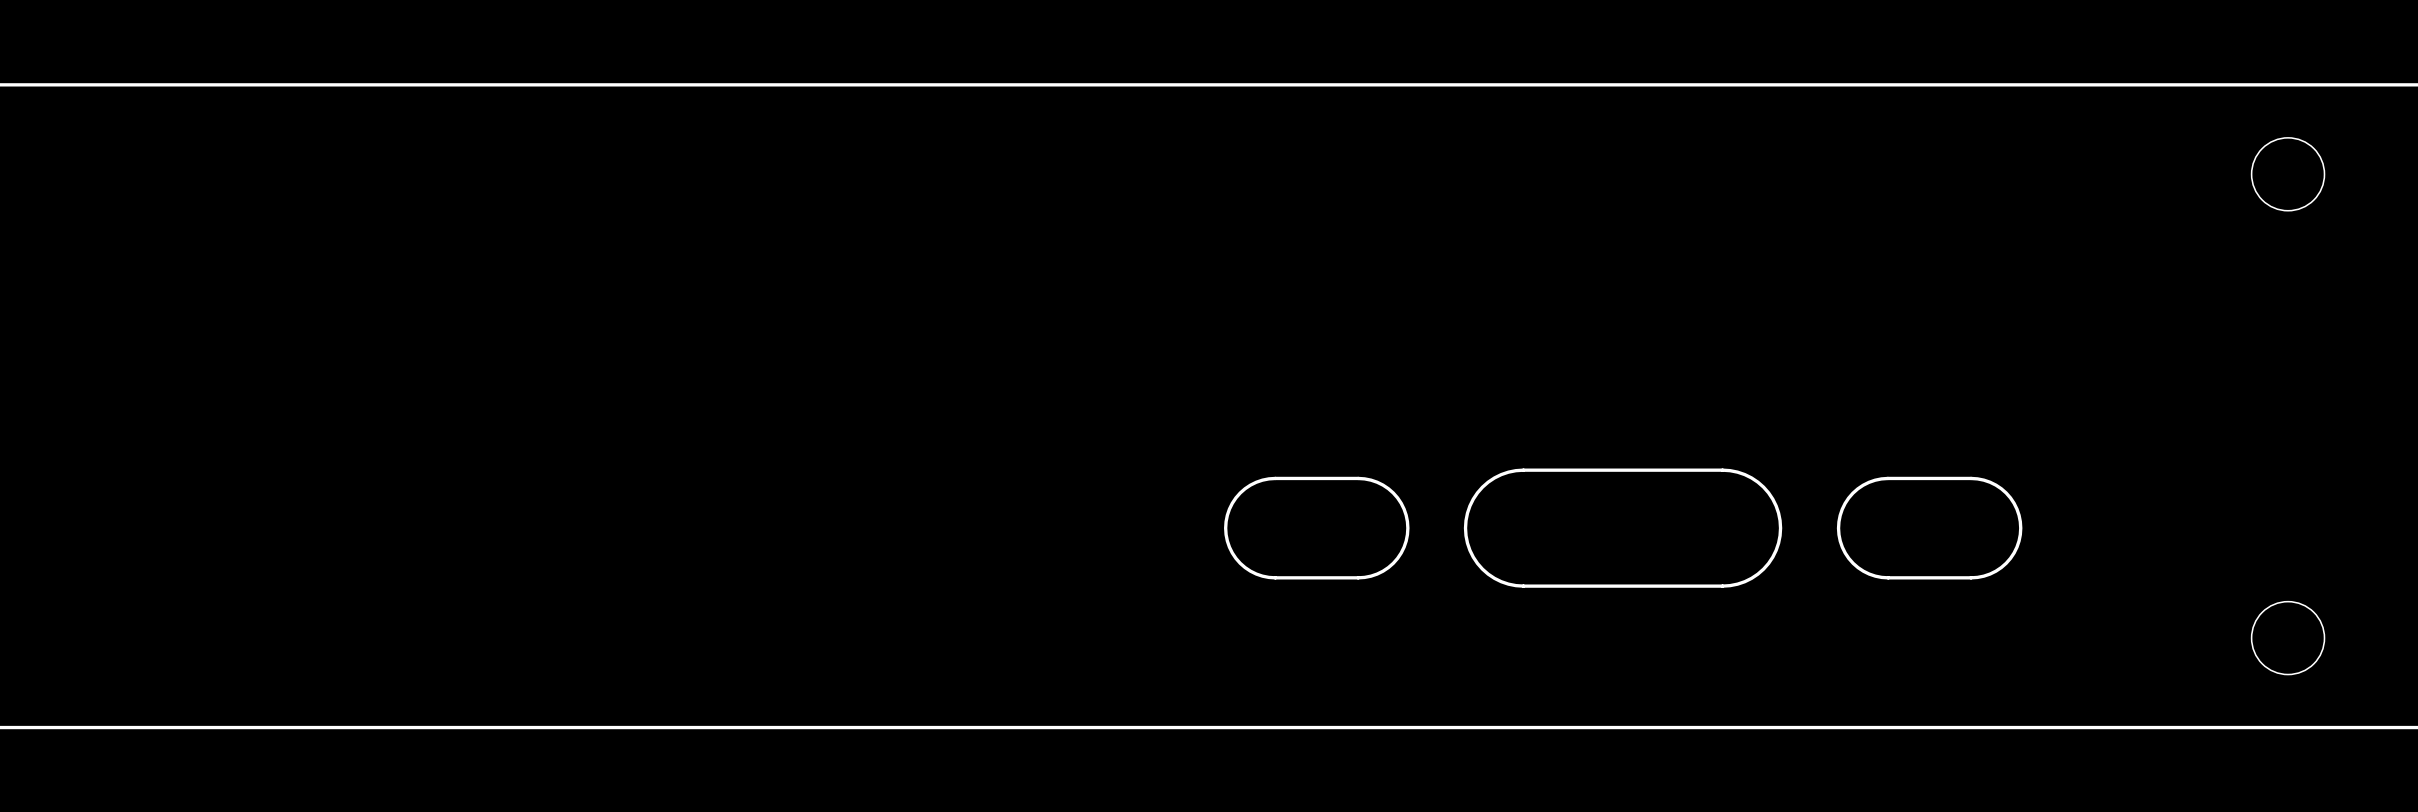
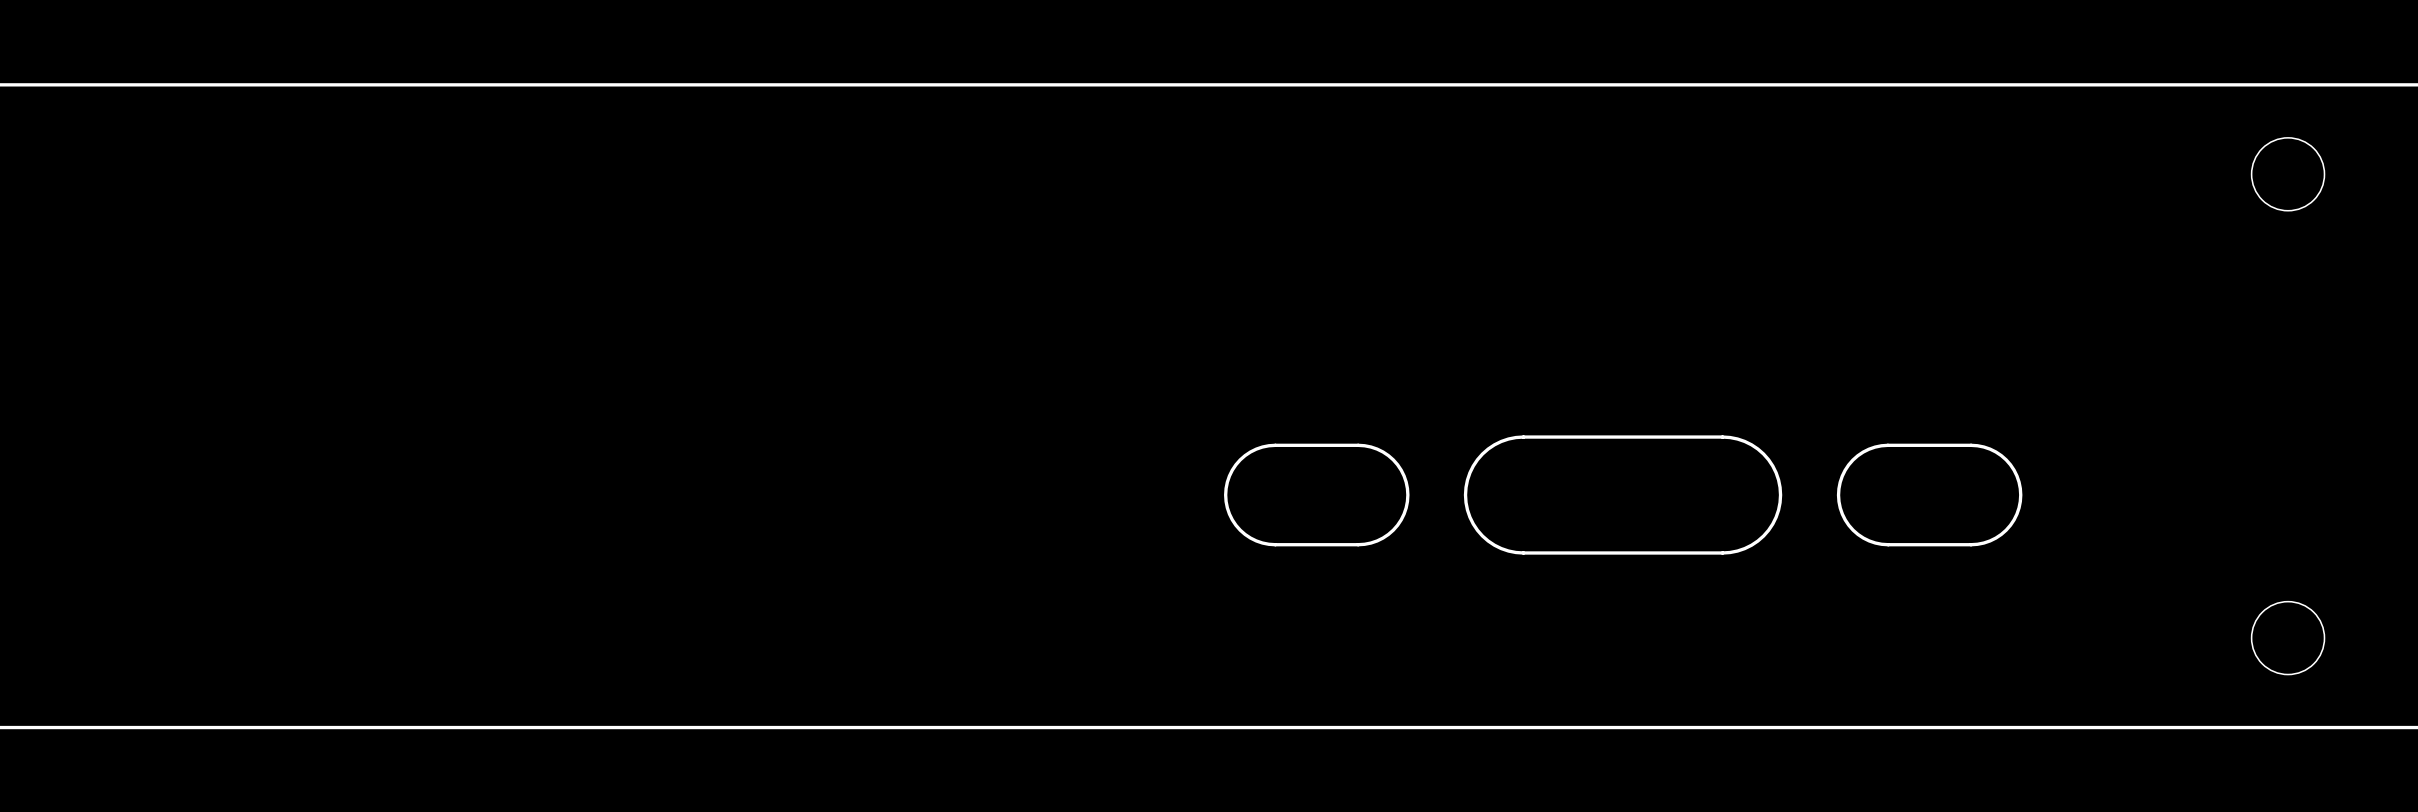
board edge: (1523, 470) (1722, 470) (1737, 472) (1757, 482) (1772, 499) (1780, 520) (1778, 543) (1772, 557) (1763, 569) (1751, 578) (1730, 585) (1523, 586) (1508, 584) (1494, 578) (1477, 563) (1467, 543) (1466, 520) (1469, 505) (1482, 487) (1501, 474) (1523, 470) -> (1523, 437) (1722, 437) (1737, 439) (1757, 449) (1772, 466) (1780, 487) (1778, 510) (1772, 524) (1763, 536) (1751, 545) (1730, 552) (1523, 552) (1508, 551) (1494, 545) (1477, 530) (1467, 510) (1466, 487) (1469, 472) (1482, 454) (1501, 441) (1523, 437)
board edge: (1275, 478) (1358, 478) (1371, 480) (1383, 485) (1397, 497) (1406, 515) (1407, 534) (1401, 552) (1393, 563) (1383, 571) (1364, 577) (1275, 577) (1262, 576) (1250, 571) (1240, 563) (1229, 547) (1225, 528) (1227, 515) (1232, 503) (1245, 488) (1256, 482) (1275, 478) -> (1275, 445) (1358, 445) (1371, 447) (1383, 451) (1397, 464) (1406, 482) (1407, 501) (1401, 519) (1393, 530) (1383, 538) (1364, 544) (1275, 544) (1262, 543) (1250, 538) (1240, 530) (1229, 514) (1225, 495) (1227, 482) (1232, 470) (1245, 455) (1256, 449) (1275, 445)
board edge: (1887, 478) (1971, 478) (1983, 480) (1995, 485) (2010, 497) (2019, 515) (2020, 534) (2014, 552) (2006, 563) (1995, 571) (1977, 577) (1888, 577) (1875, 576) (1863, 571) (1853, 563) (1842, 547) (1838, 528) (1840, 515) (1845, 503) (1857, 488) (1868, 482) (1887, 478) -> (1887, 445) (1971, 445) (1983, 447) (1995, 451) (2010, 464) (2019, 482) (2020, 501) (2014, 519) (2006, 530) (1995, 538) (1977, 544) (1888, 544) (1875, 543) (1863, 538) (1853, 530) (1842, 514) (1838, 495) (1840, 482) (1845, 470) (1857, 455) (1868, 449) (1887, 445)

